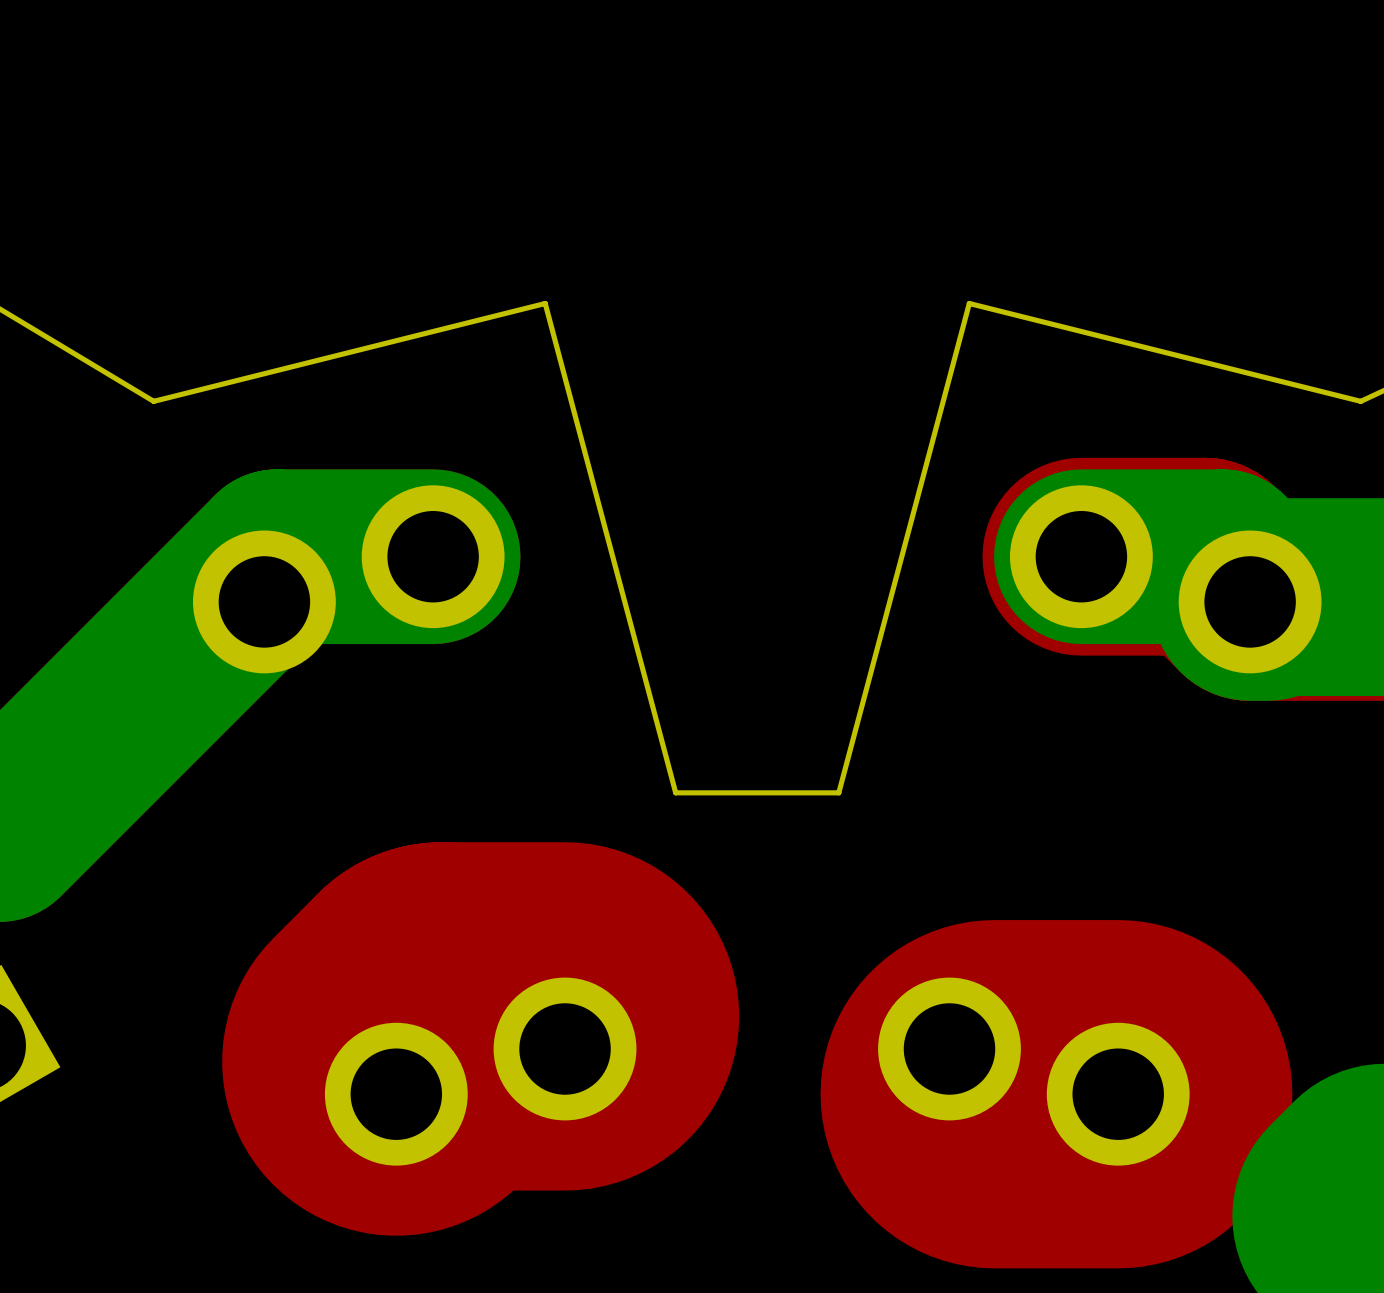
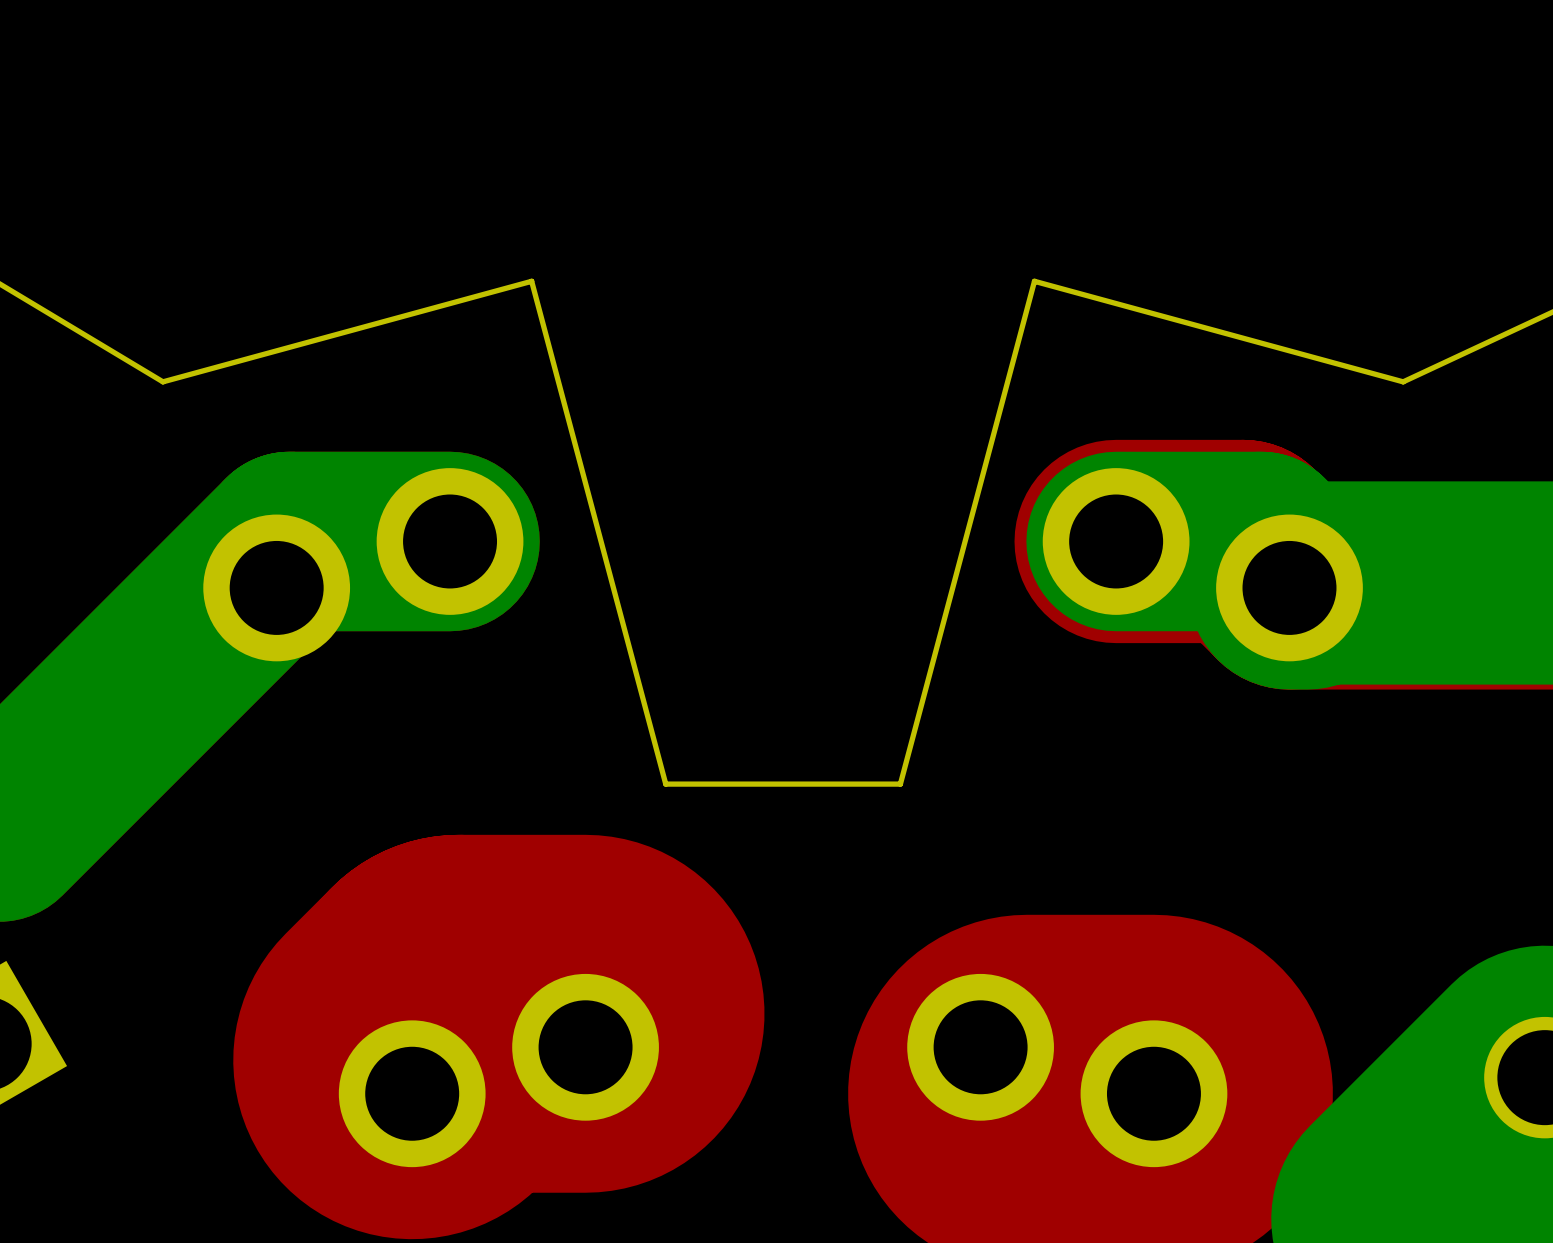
board edge: (153, 401) (545, 303) (675, 792) -> (162, 381) (531, 281) (665, 784) (699, 784)
board edge: (1360, 401) (969, 303) (838, 792) -> (1403, 381) (1034, 281) (900, 784) (866, 784)

